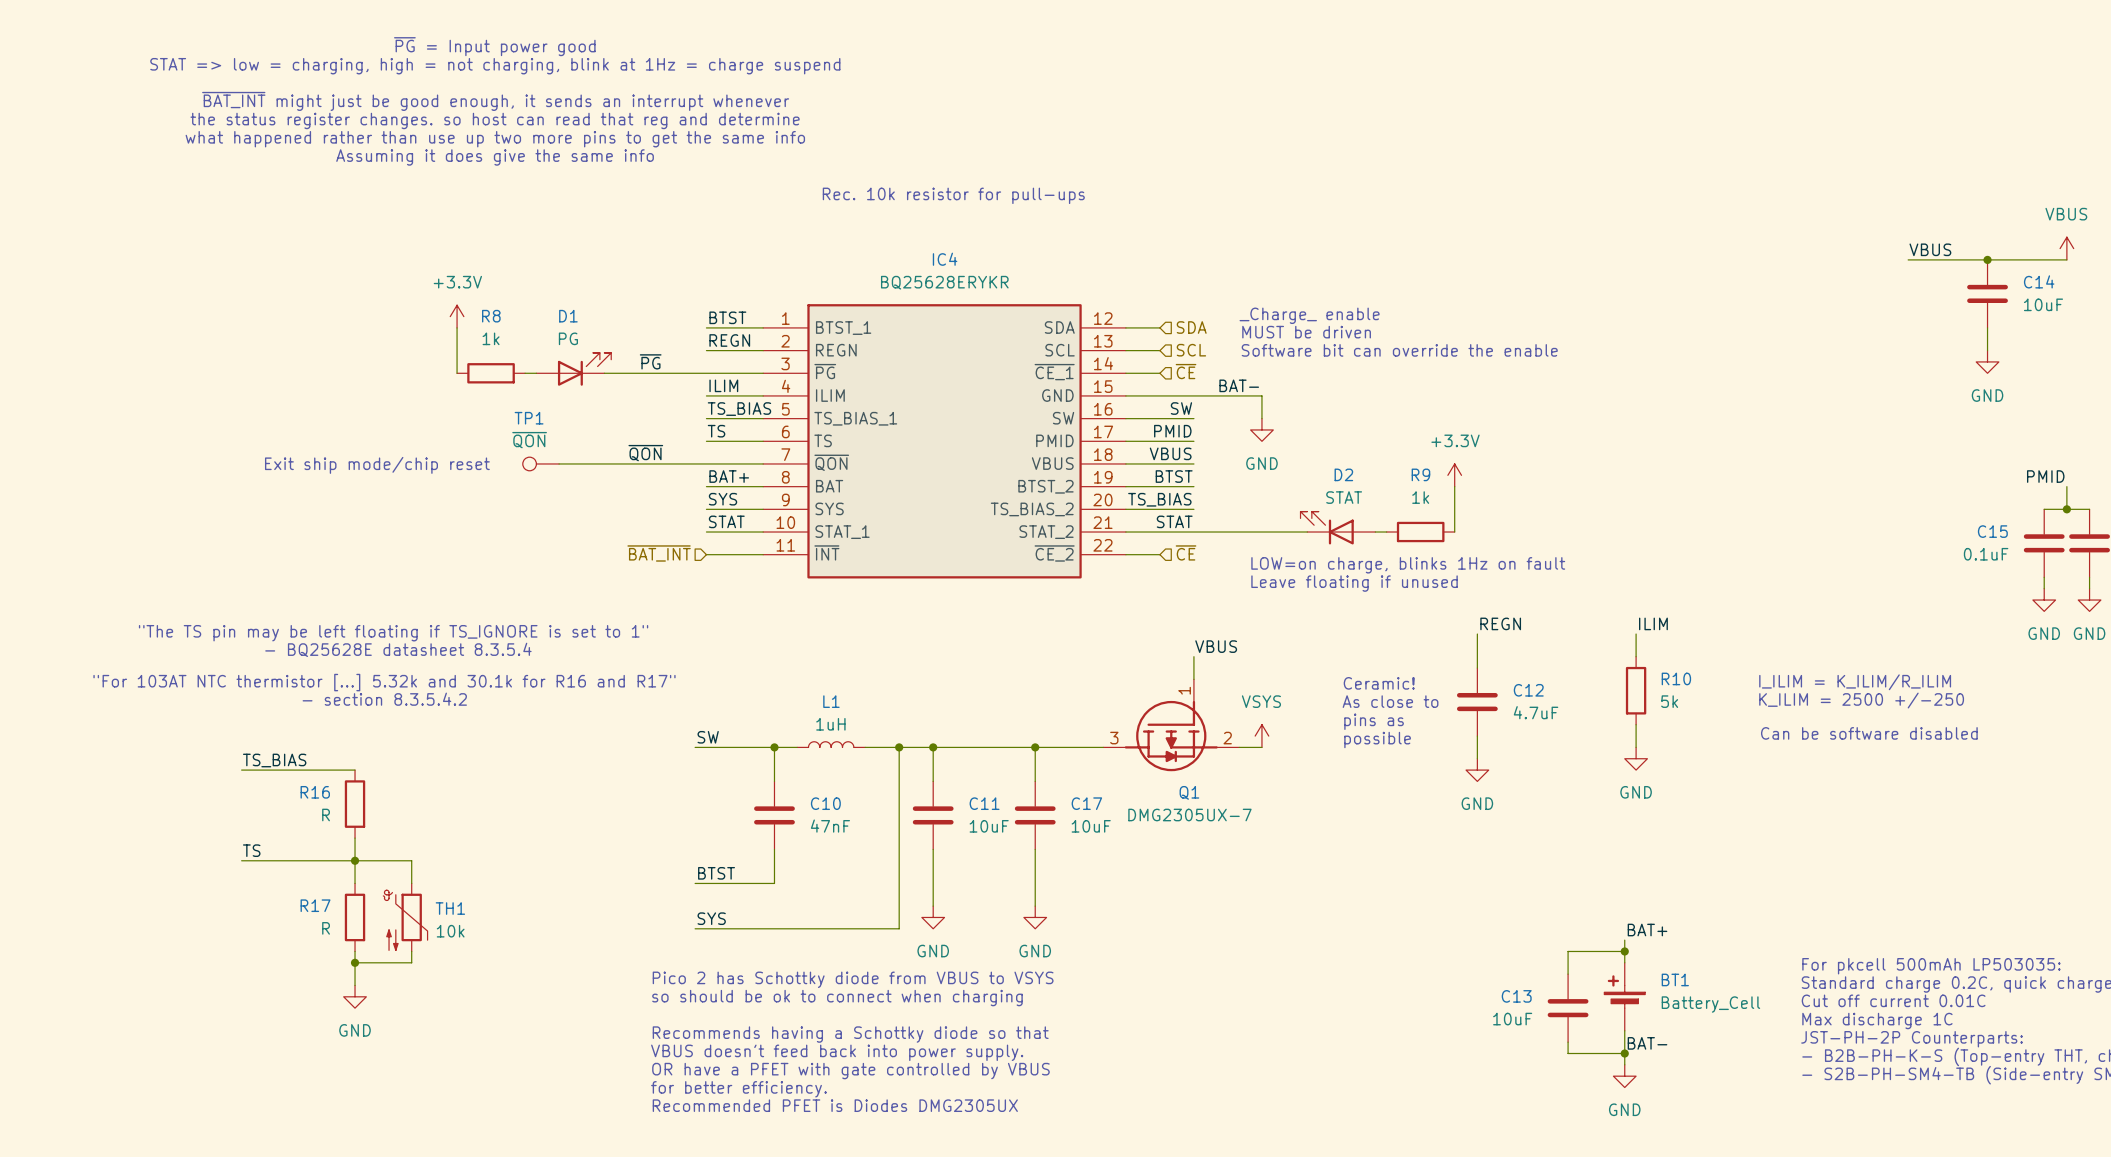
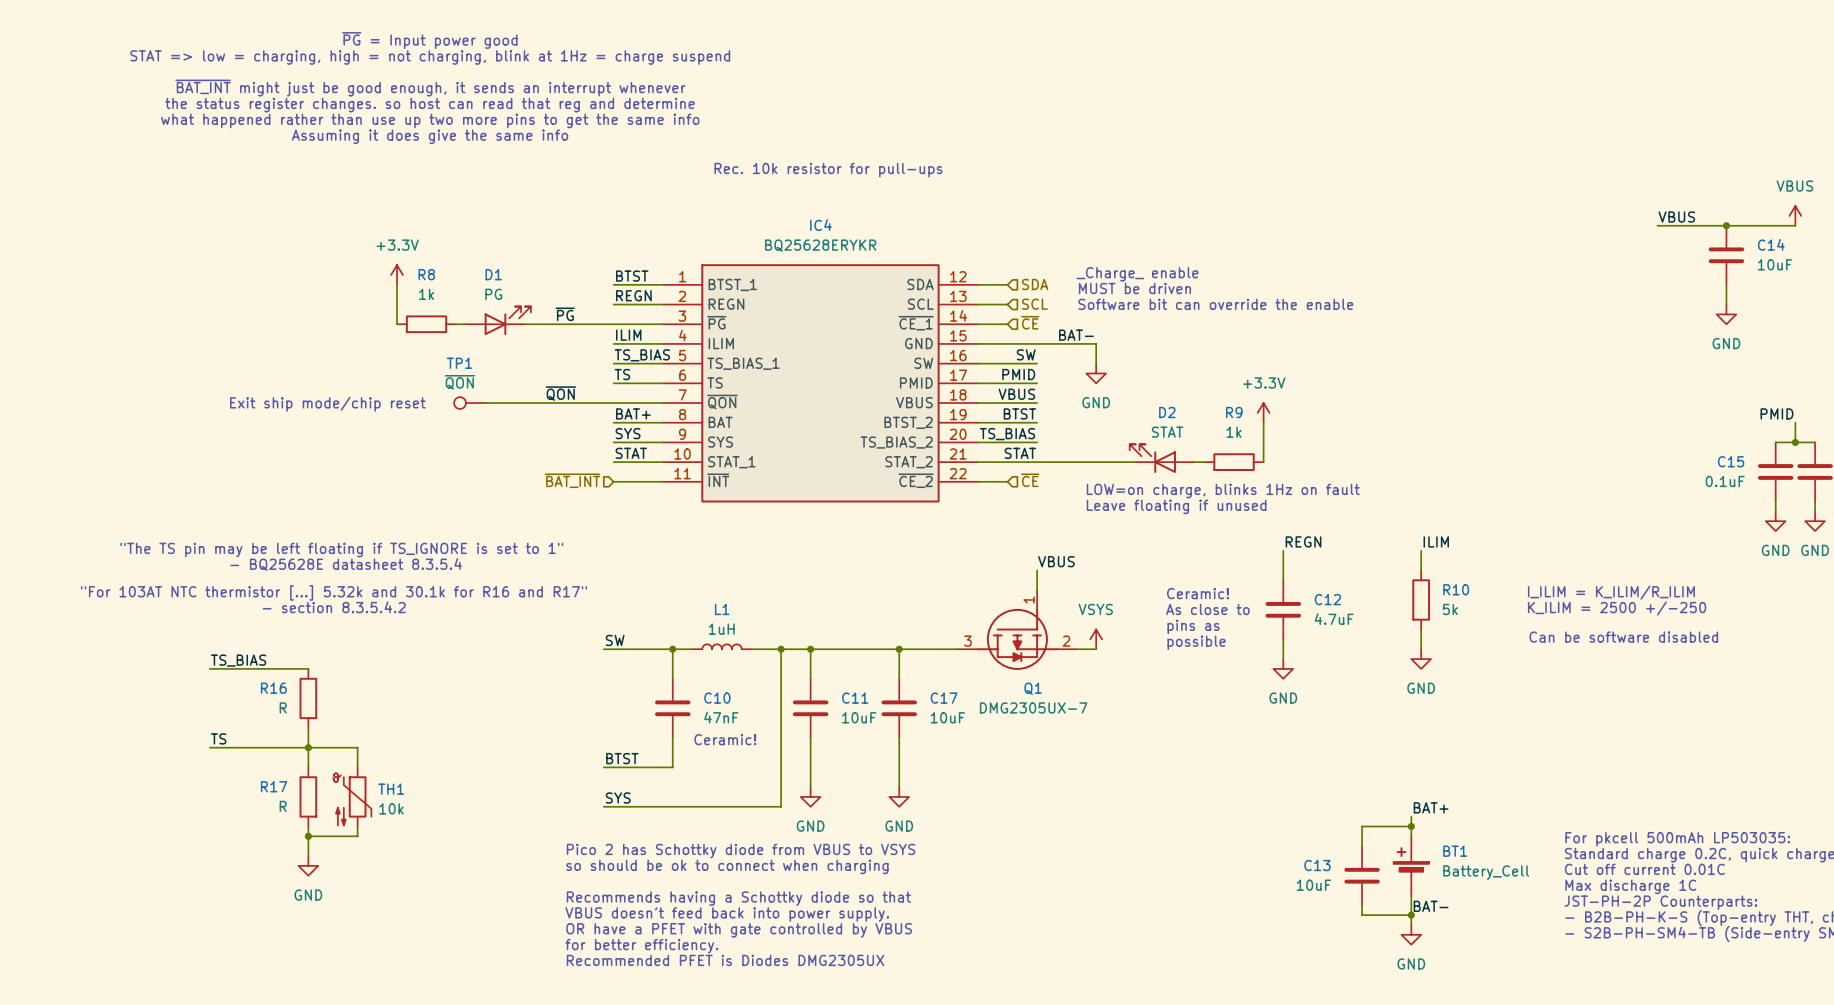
text: none -> Ceramic! (725, 739)

